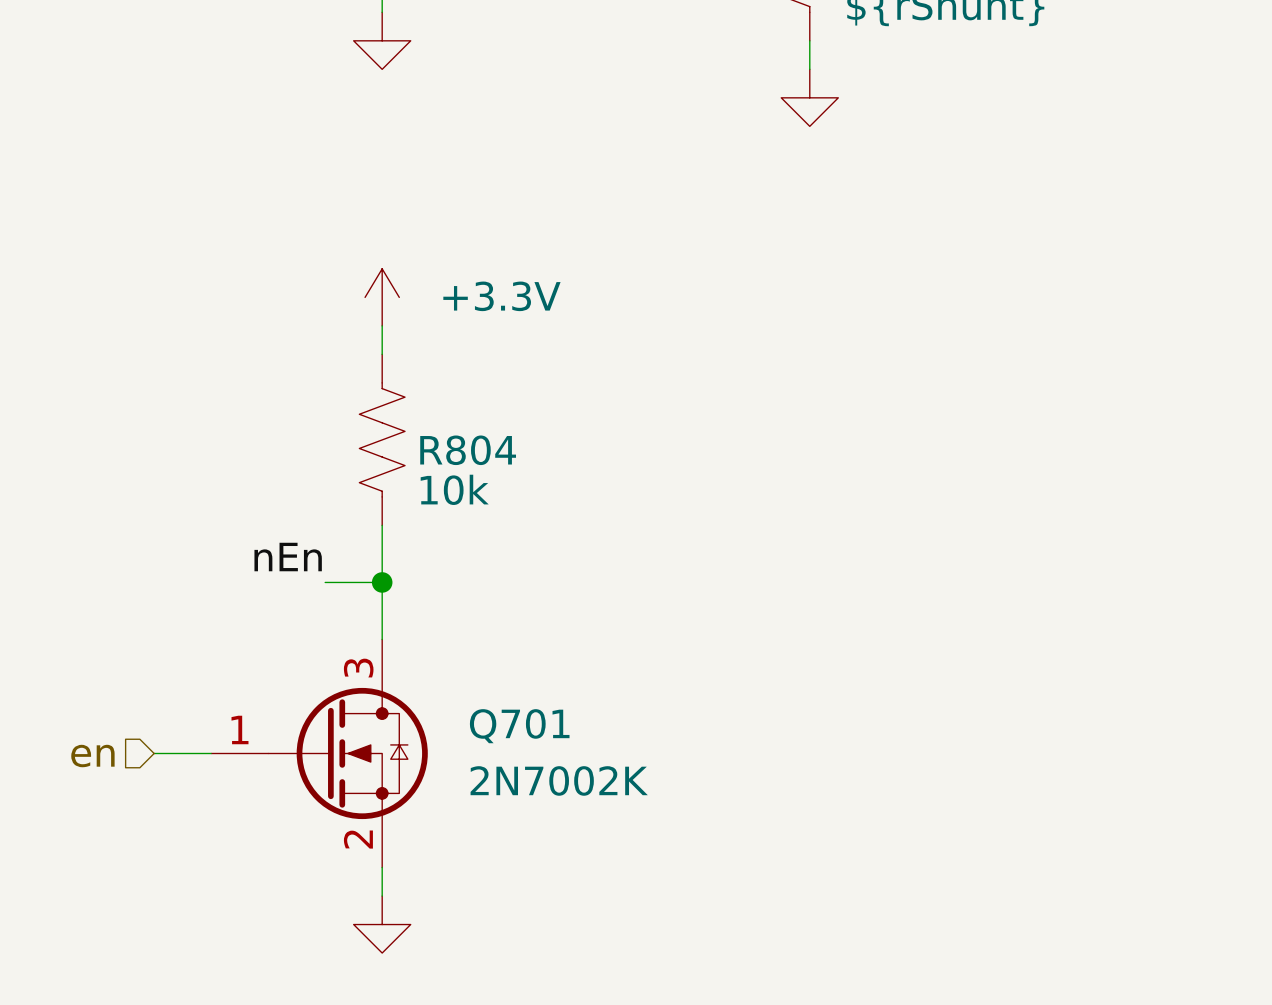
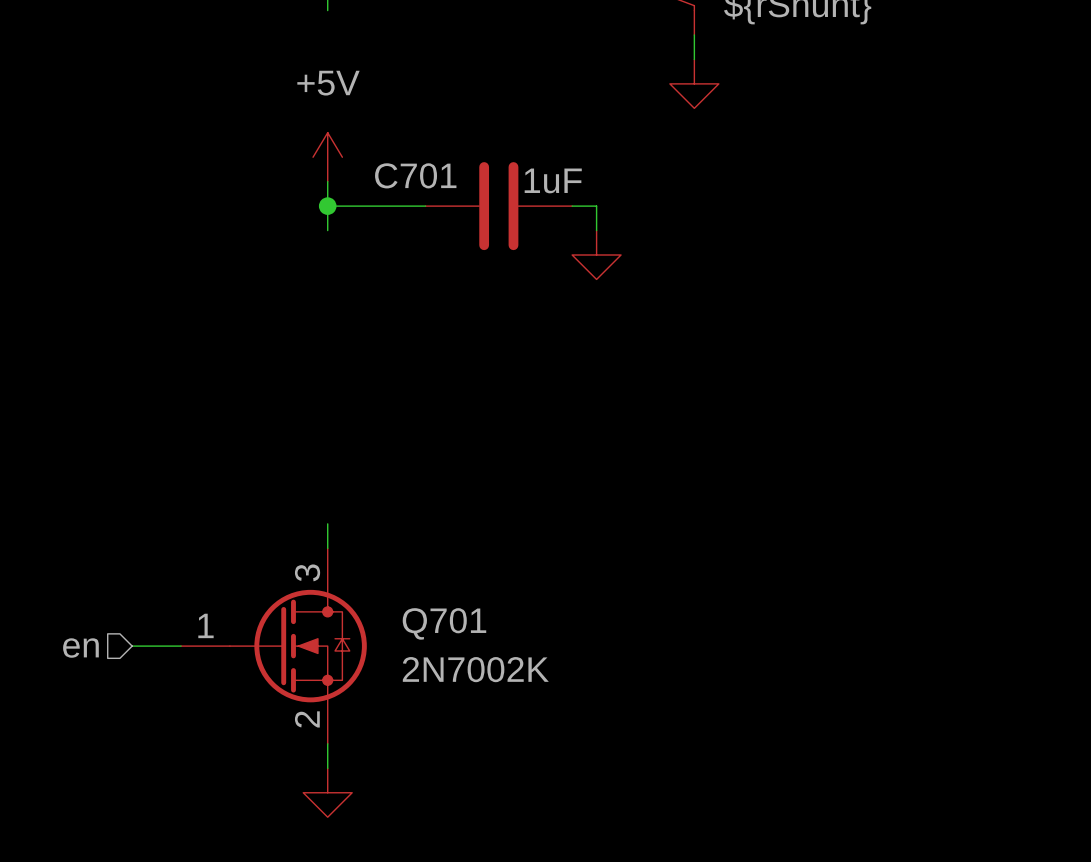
power symbol position: (382, 40) -> (596, 255)
power symbol: none -> +5V (327, 157)
wire: none -> (327, 181) (327, 230)
wire: none -> (327, 206) (425, 206)
junction: none -> (327, 206)
C701: none -> 1uF (498, 206)
wire: none -> (572, 206) (596, 206) (596, 230)
power symbol: +3.3V (382, 297) -> none
wire: (382, 325) (382, 354) -> none
R804: 10k (382, 439) -> none
wire: (382, 525) (382, 610) -> none
label: nEn (288, 557) -> none
wire: (325, 582) (382, 582) -> none
junction: (382, 582) -> none

